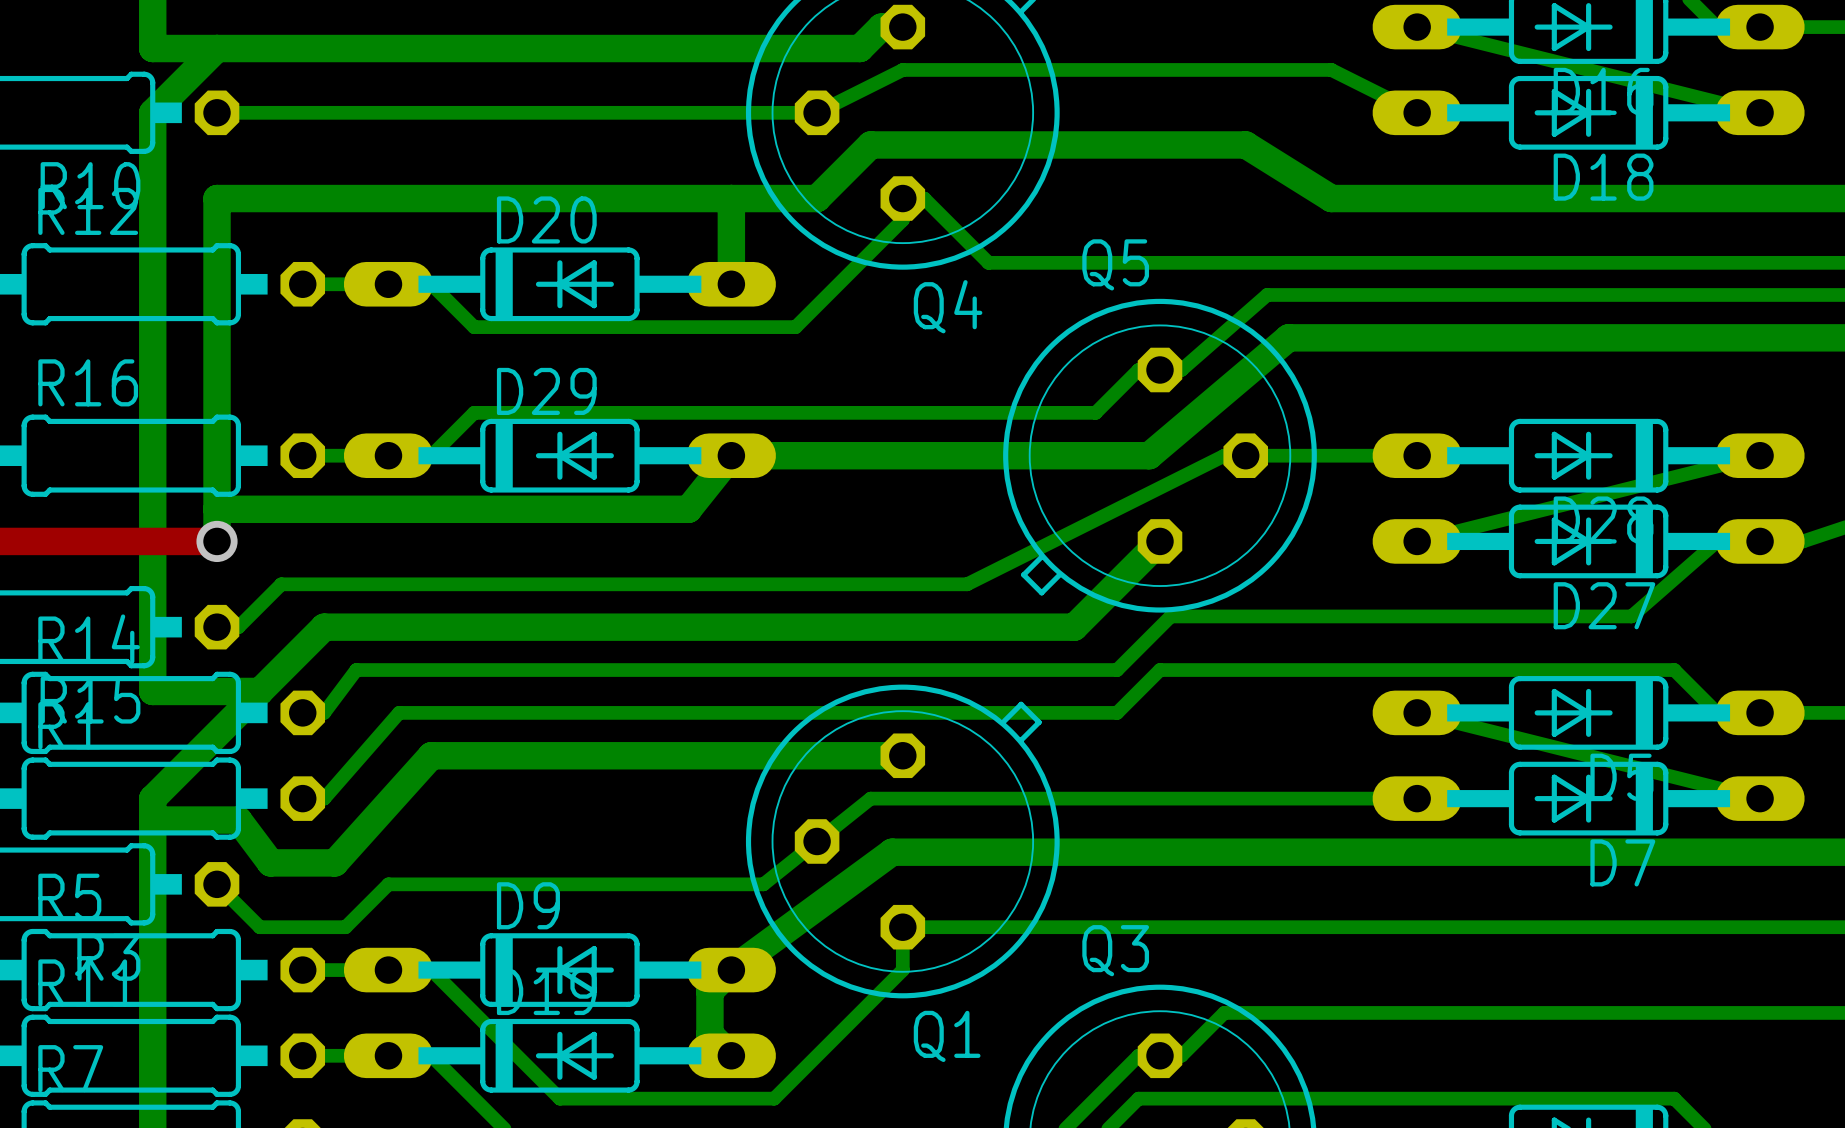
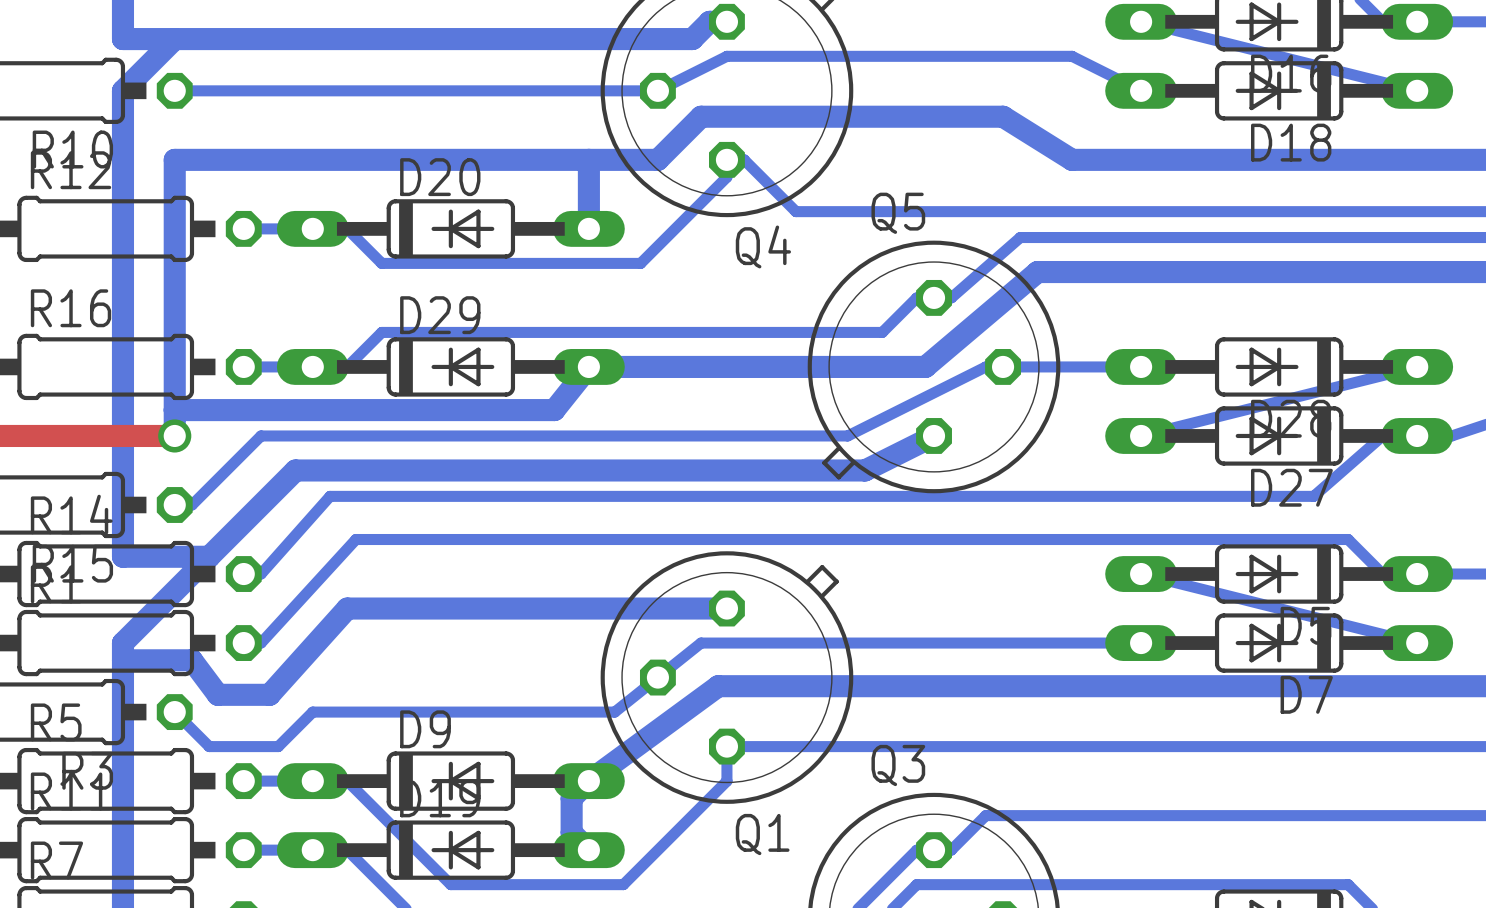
bottom track: (1052, 541) (967, 584) -> (934, 435) (865, 470) (778, 470)
bottom track: none -> (847, 435) (261, 435) (226, 470)
bottom track: (1159, 541) (1074, 627) (324, 627) -> none
bottom track: (281, 584) (367, 584) -> (261, 504) (295, 470)
bottom track width: thin (367, 584) (967, 584) -> thick (295, 470) (778, 470)
bottom track: (1170, 616) (1117, 670) -> (934, 539) (899, 539)
bottom track: none -> (942, 496) (330, 496) (261, 574)
bottom track: (442, 670) (356, 670) (324, 712) -> (355, 539) (261, 643)
bottom track: (1159, 670) (1117, 712) (399, 712) (324, 798) -> none

